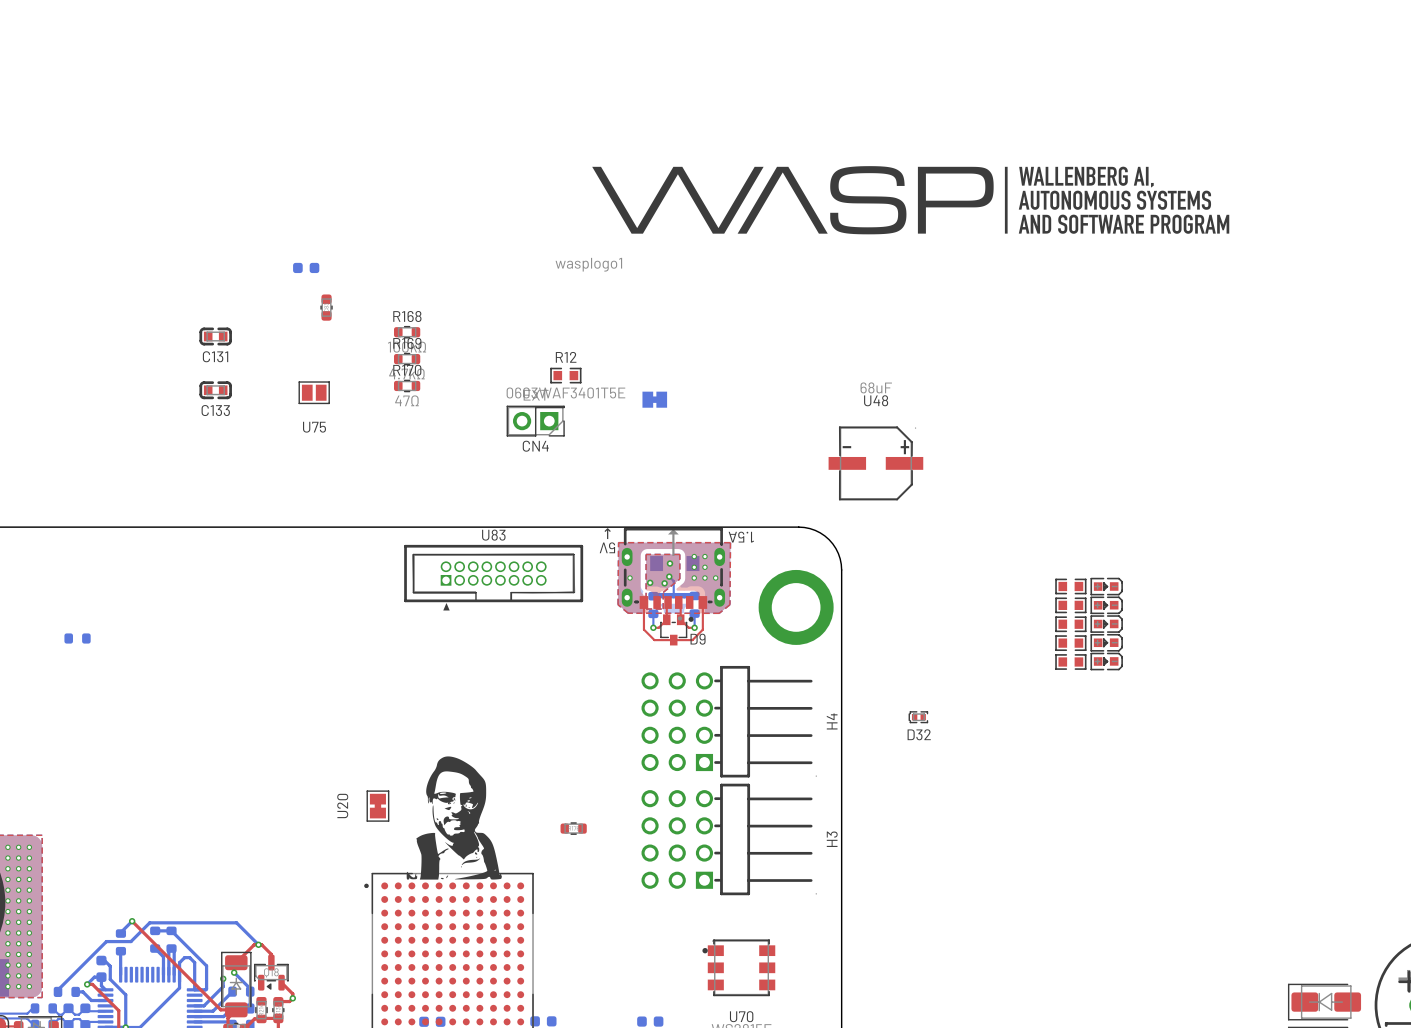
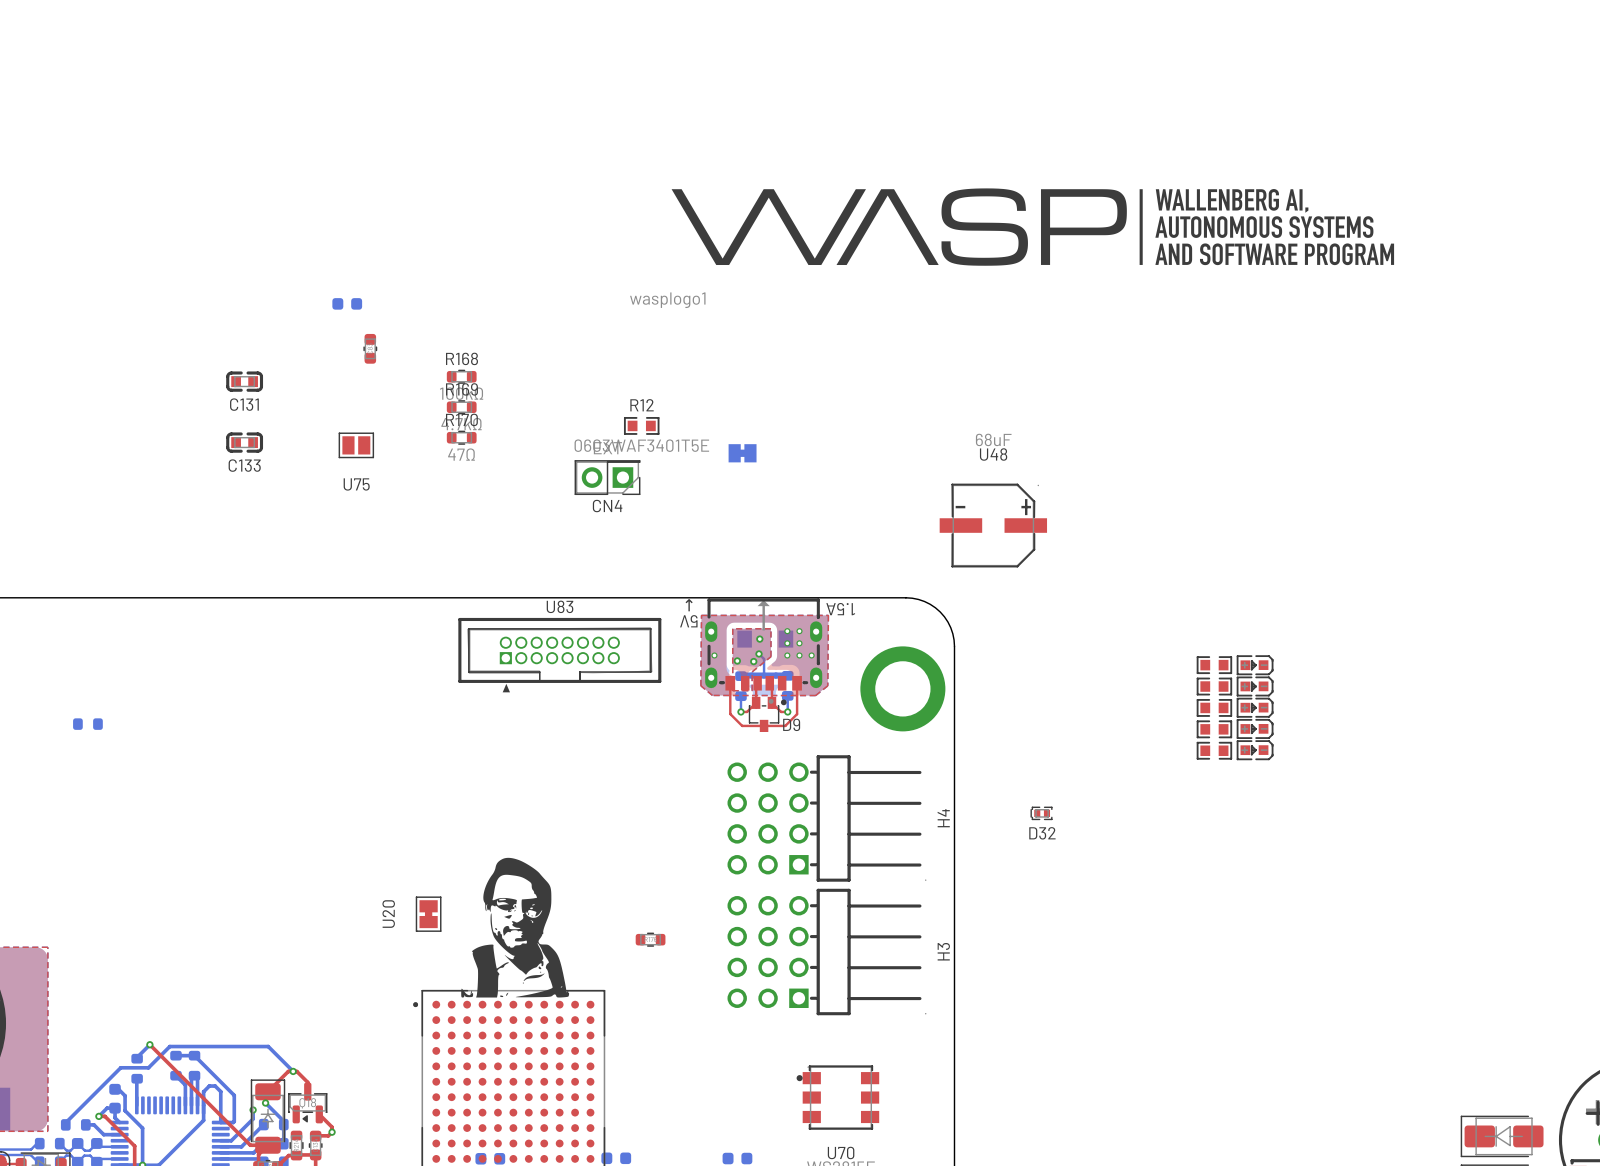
via: (7, 847) -> none
via: (18, 847) -> none
via: (29, 847) -> none
via: (7, 858) -> none
via: (18, 858) -> none
via: (29, 858) -> none
via: (7, 868) -> none
via: (18, 868) -> none
via: (29, 868) -> none
via: (7, 879) -> none
via: (18, 879) -> none
via: (29, 879) -> none
via: (7, 890) -> none
via: (18, 890) -> none
via: (29, 890) -> none
via: (7, 900) -> none
via: (18, 900) -> none
via: (29, 900) -> none
via: (7, 911) -> none
via: (18, 911) -> none
via: (29, 911) -> none
via: (7, 922) -> none
via: (18, 922) -> none
via: (29, 922) -> none
via: (7, 933) -> none
via: (18, 933) -> none
via: (29, 933) -> none
via: (7, 943) -> none
via: (18, 943) -> none
via: (29, 943) -> none
via: (7, 954) -> none
via: (18, 954) -> none
via: (29, 954) -> none
via: (7, 965) -> none
via: (18, 965) -> none
via: (29, 965) -> none
via: (7, 975) -> none
via: (18, 975) -> none
via: (29, 975) -> none
via: (7, 986) -> none
via: (18, 986) -> none
via: (29, 986) -> none

